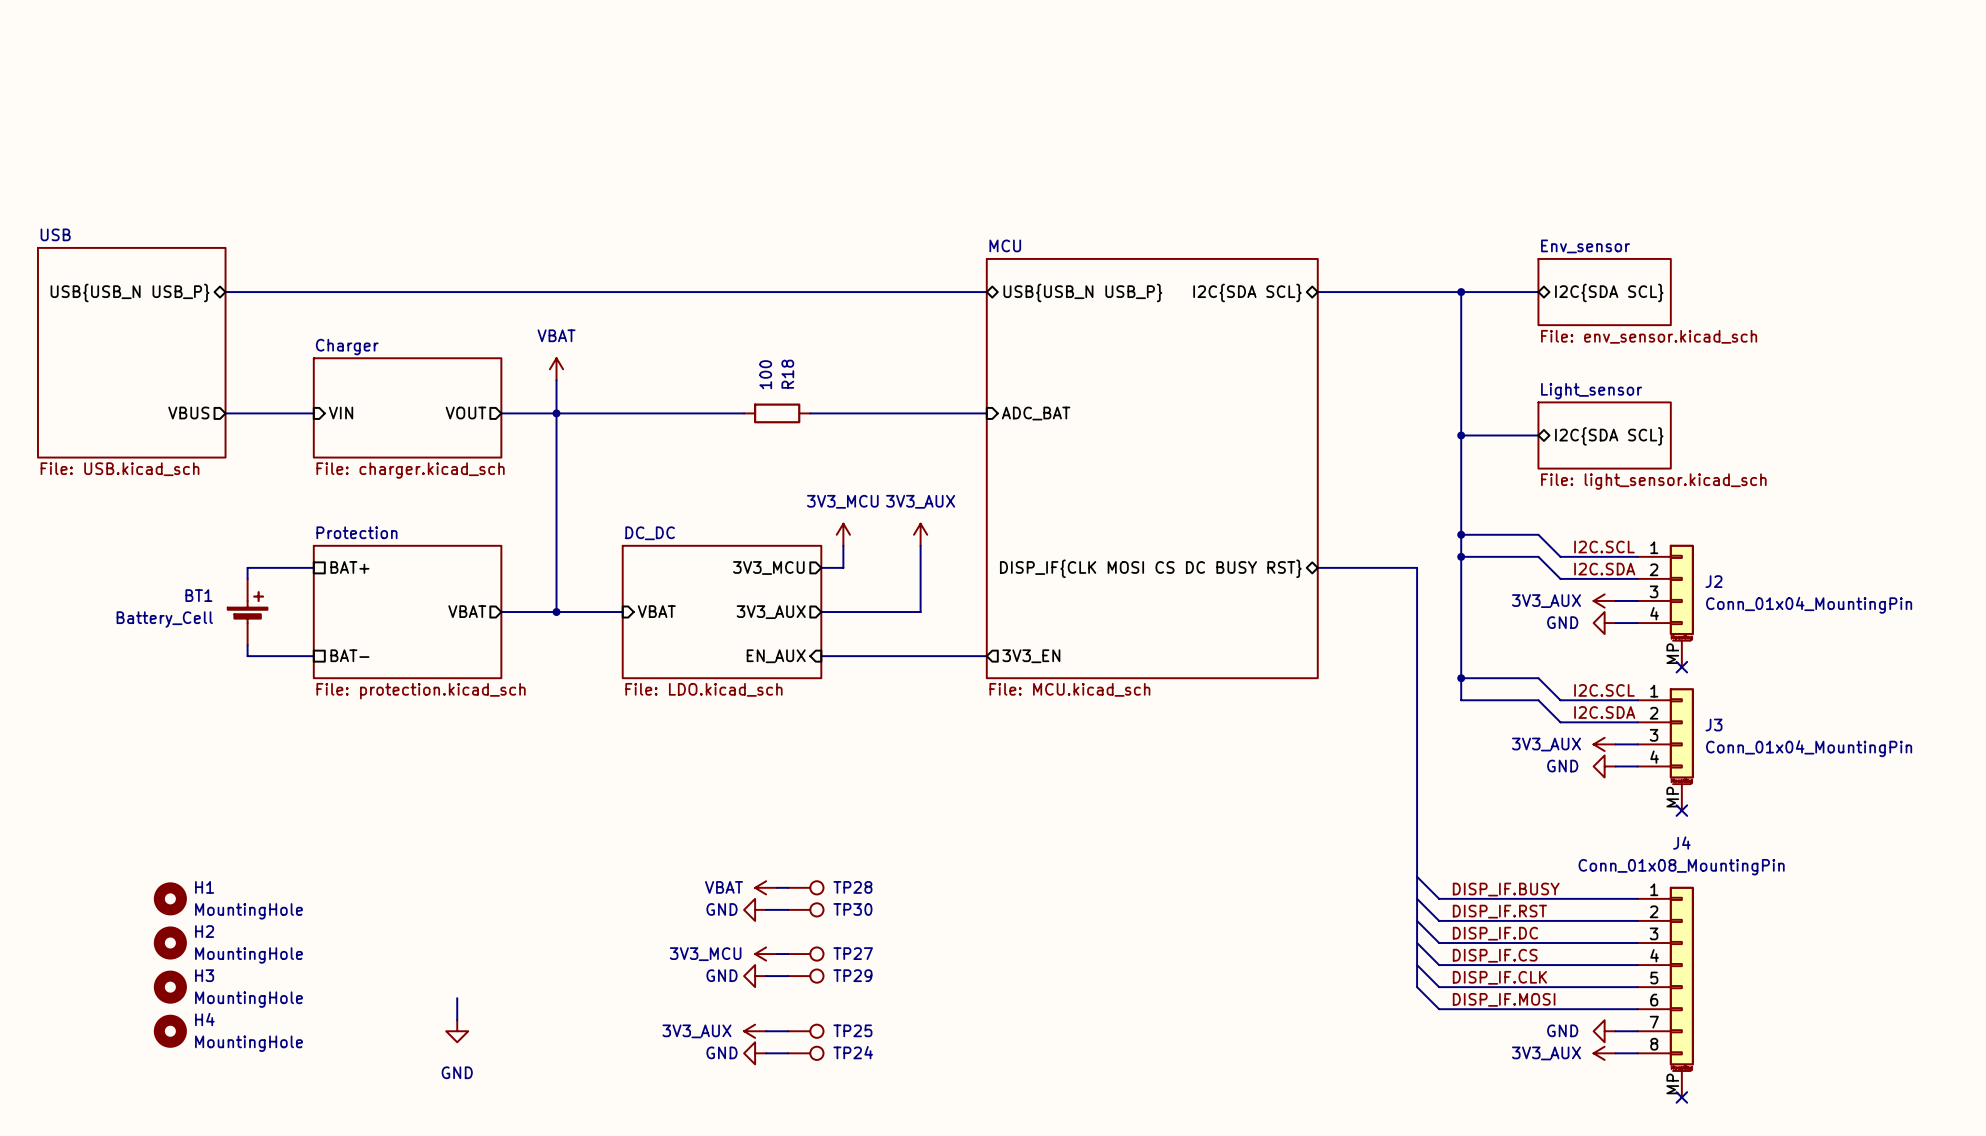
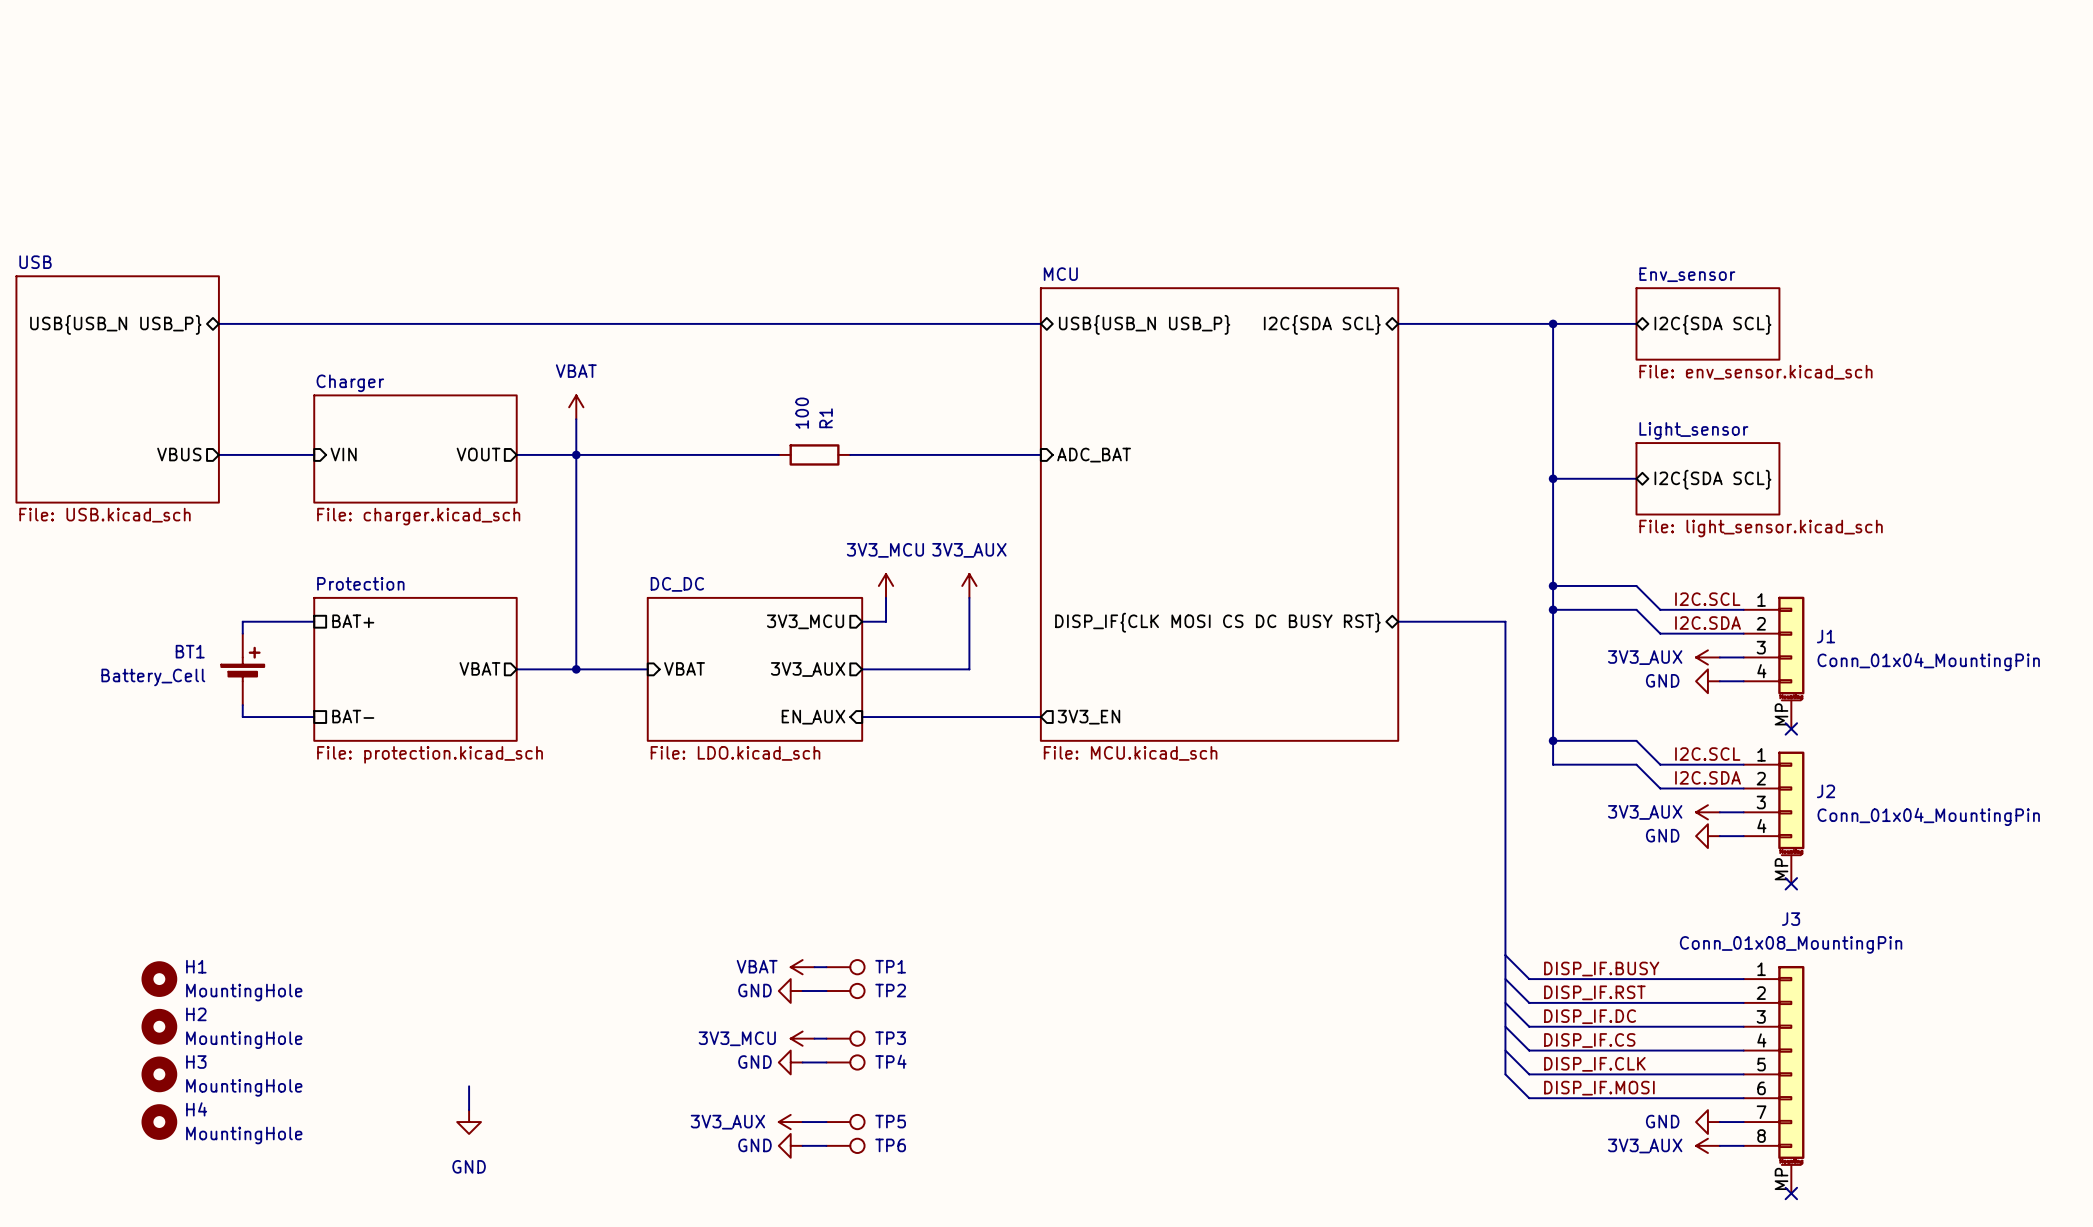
R18 name: R18 (787, 374) -> R1 (826, 418)
J2 name: J2 (1714, 581) -> J1 (1826, 636)
J3 name: J3 (1714, 725) -> J2 (1826, 791)
J4 name: J4 (1681, 843) -> J3 (1791, 919)
TP28 name: TP28 (852, 887) -> TP1 (890, 966)
TP30 name: TP30 (852, 909) -> TP2 (890, 990)
TP27 name: TP27 (853, 953) -> TP3 (890, 1038)
TP29 name: TP29 (852, 975) -> TP4 (890, 1061)
TP25 name: TP25 (852, 1030) -> TP5 (890, 1121)
TP24 name: TP24 (853, 1052) -> TP6 (890, 1145)

